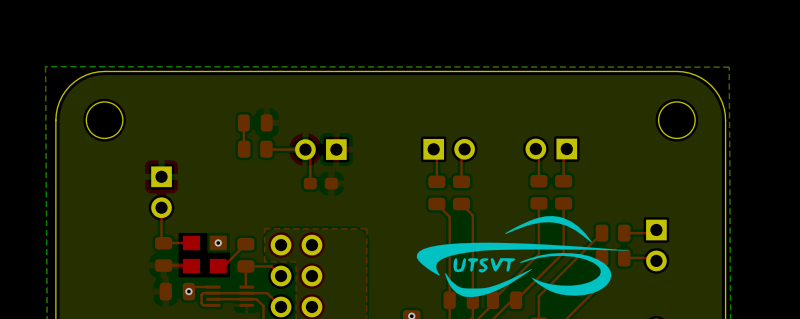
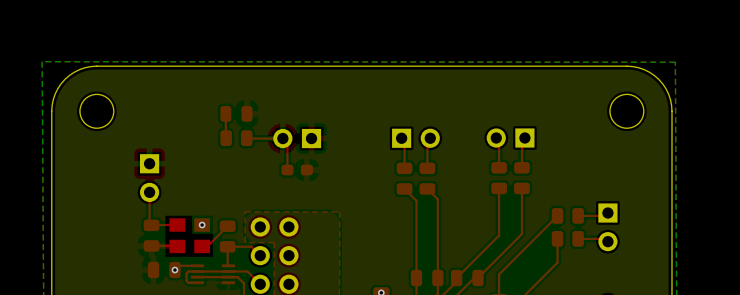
drawing: [416, 216, 630, 298] -> none

